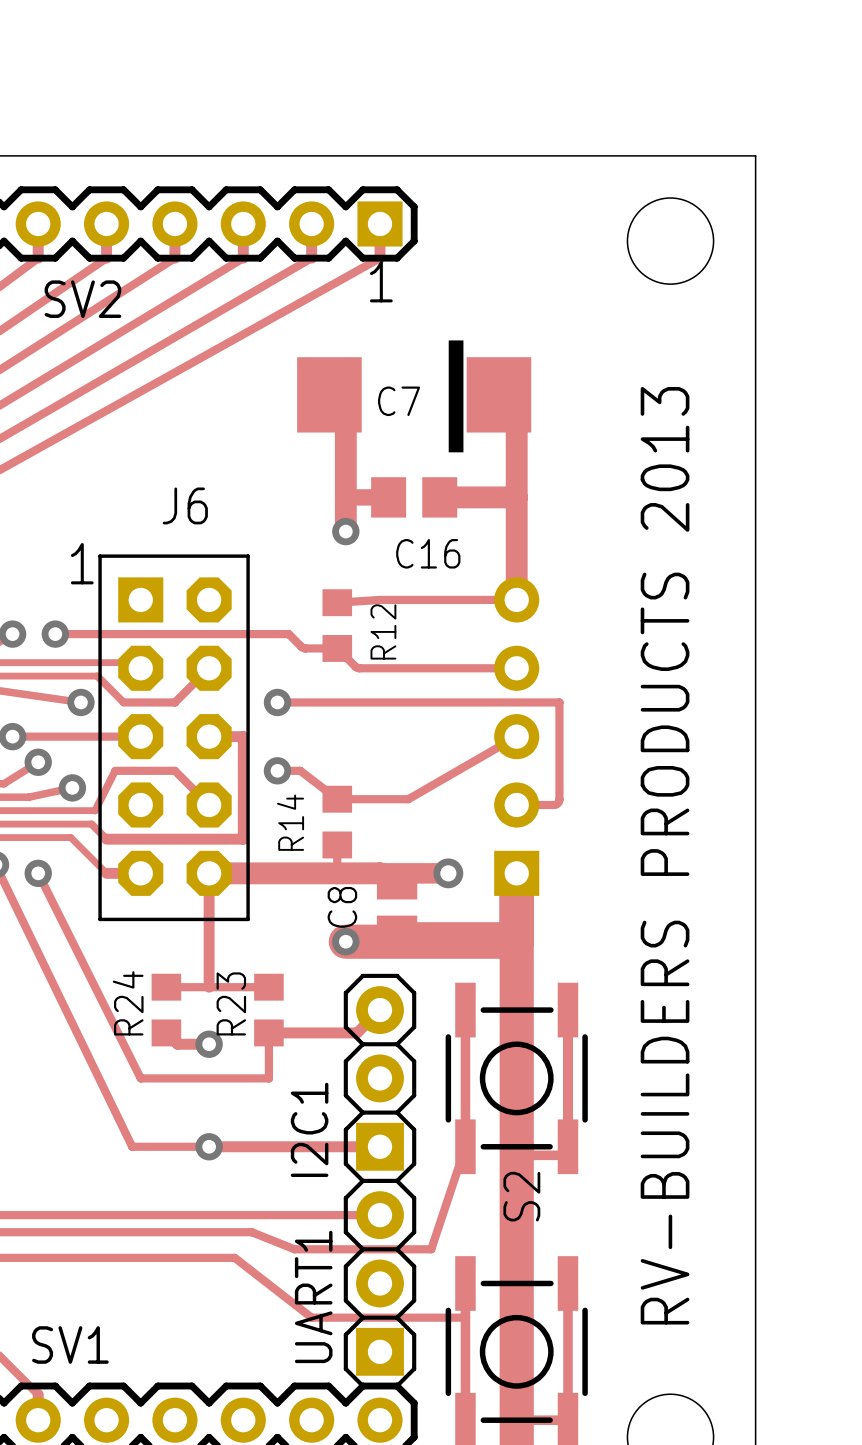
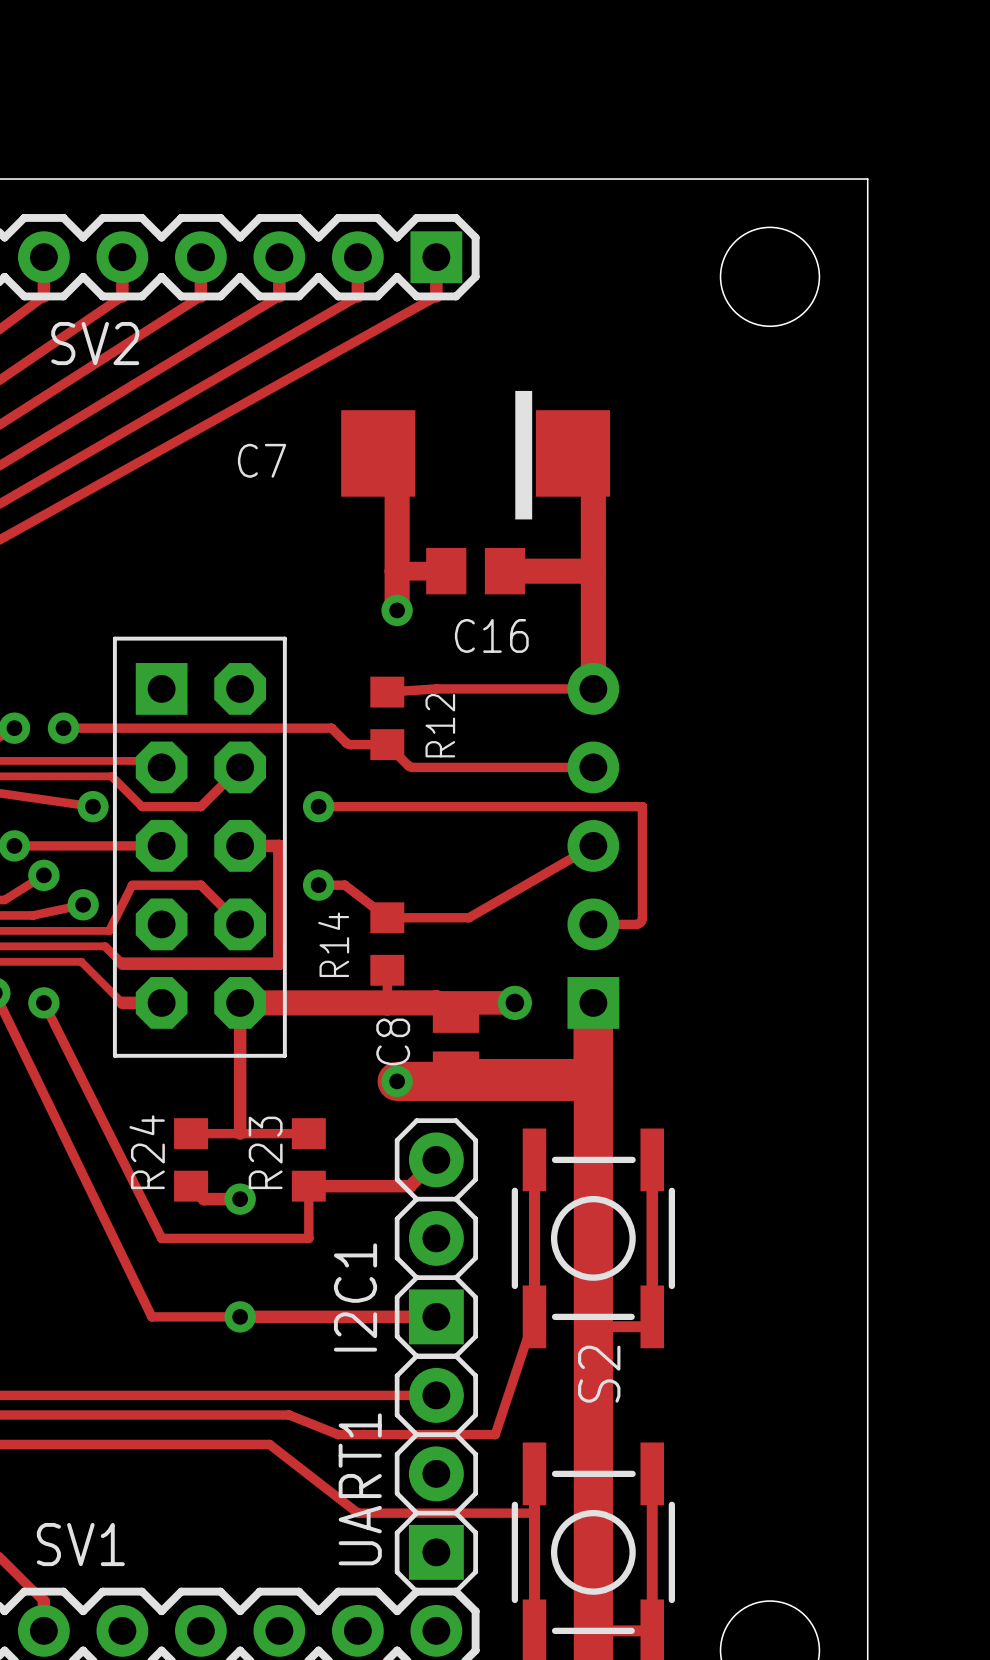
text: 1 (381, 281) -> none
C7 name position: C7 (399, 401) -> C7 (262, 460)
text: J6 (185, 505) -> none
text: 1 (82, 563) -> none
text: RV-BUILDERS PRODUCTS 2013 (665, 855) -> none

